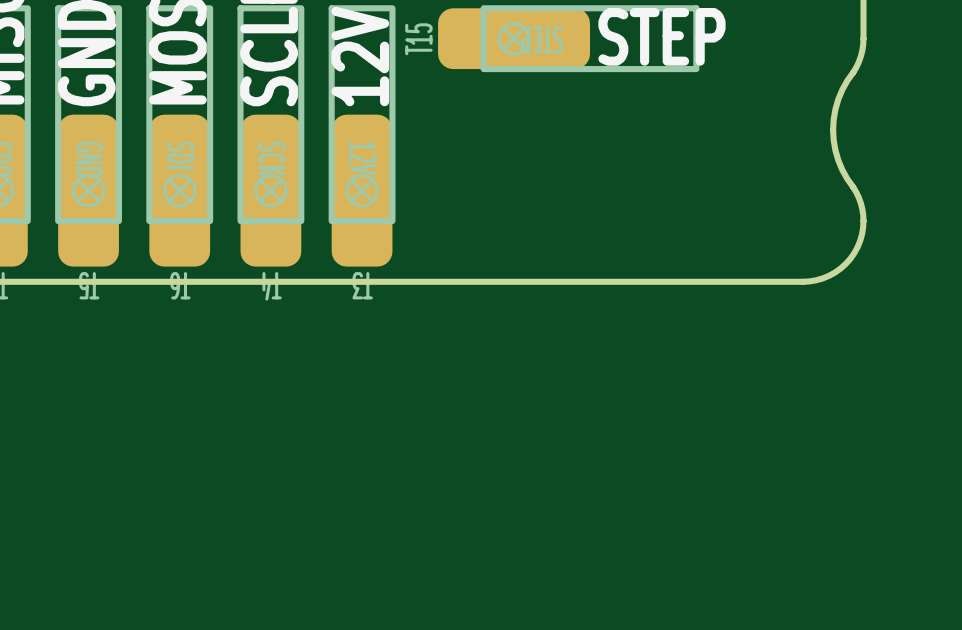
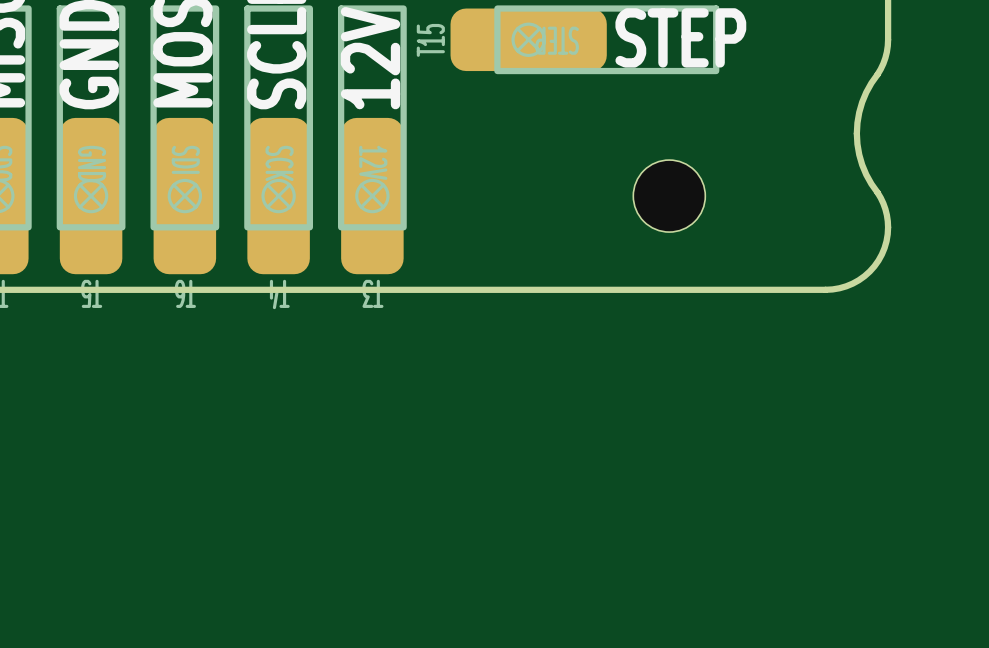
part: none -> (669, 196)

